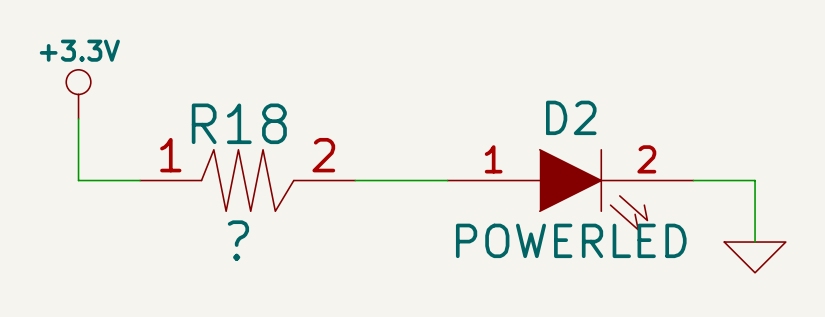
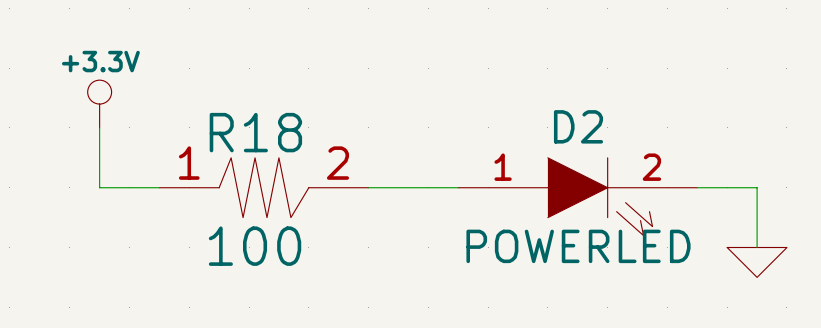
R18 value: ? (238, 240) -> 100 (255, 246)

